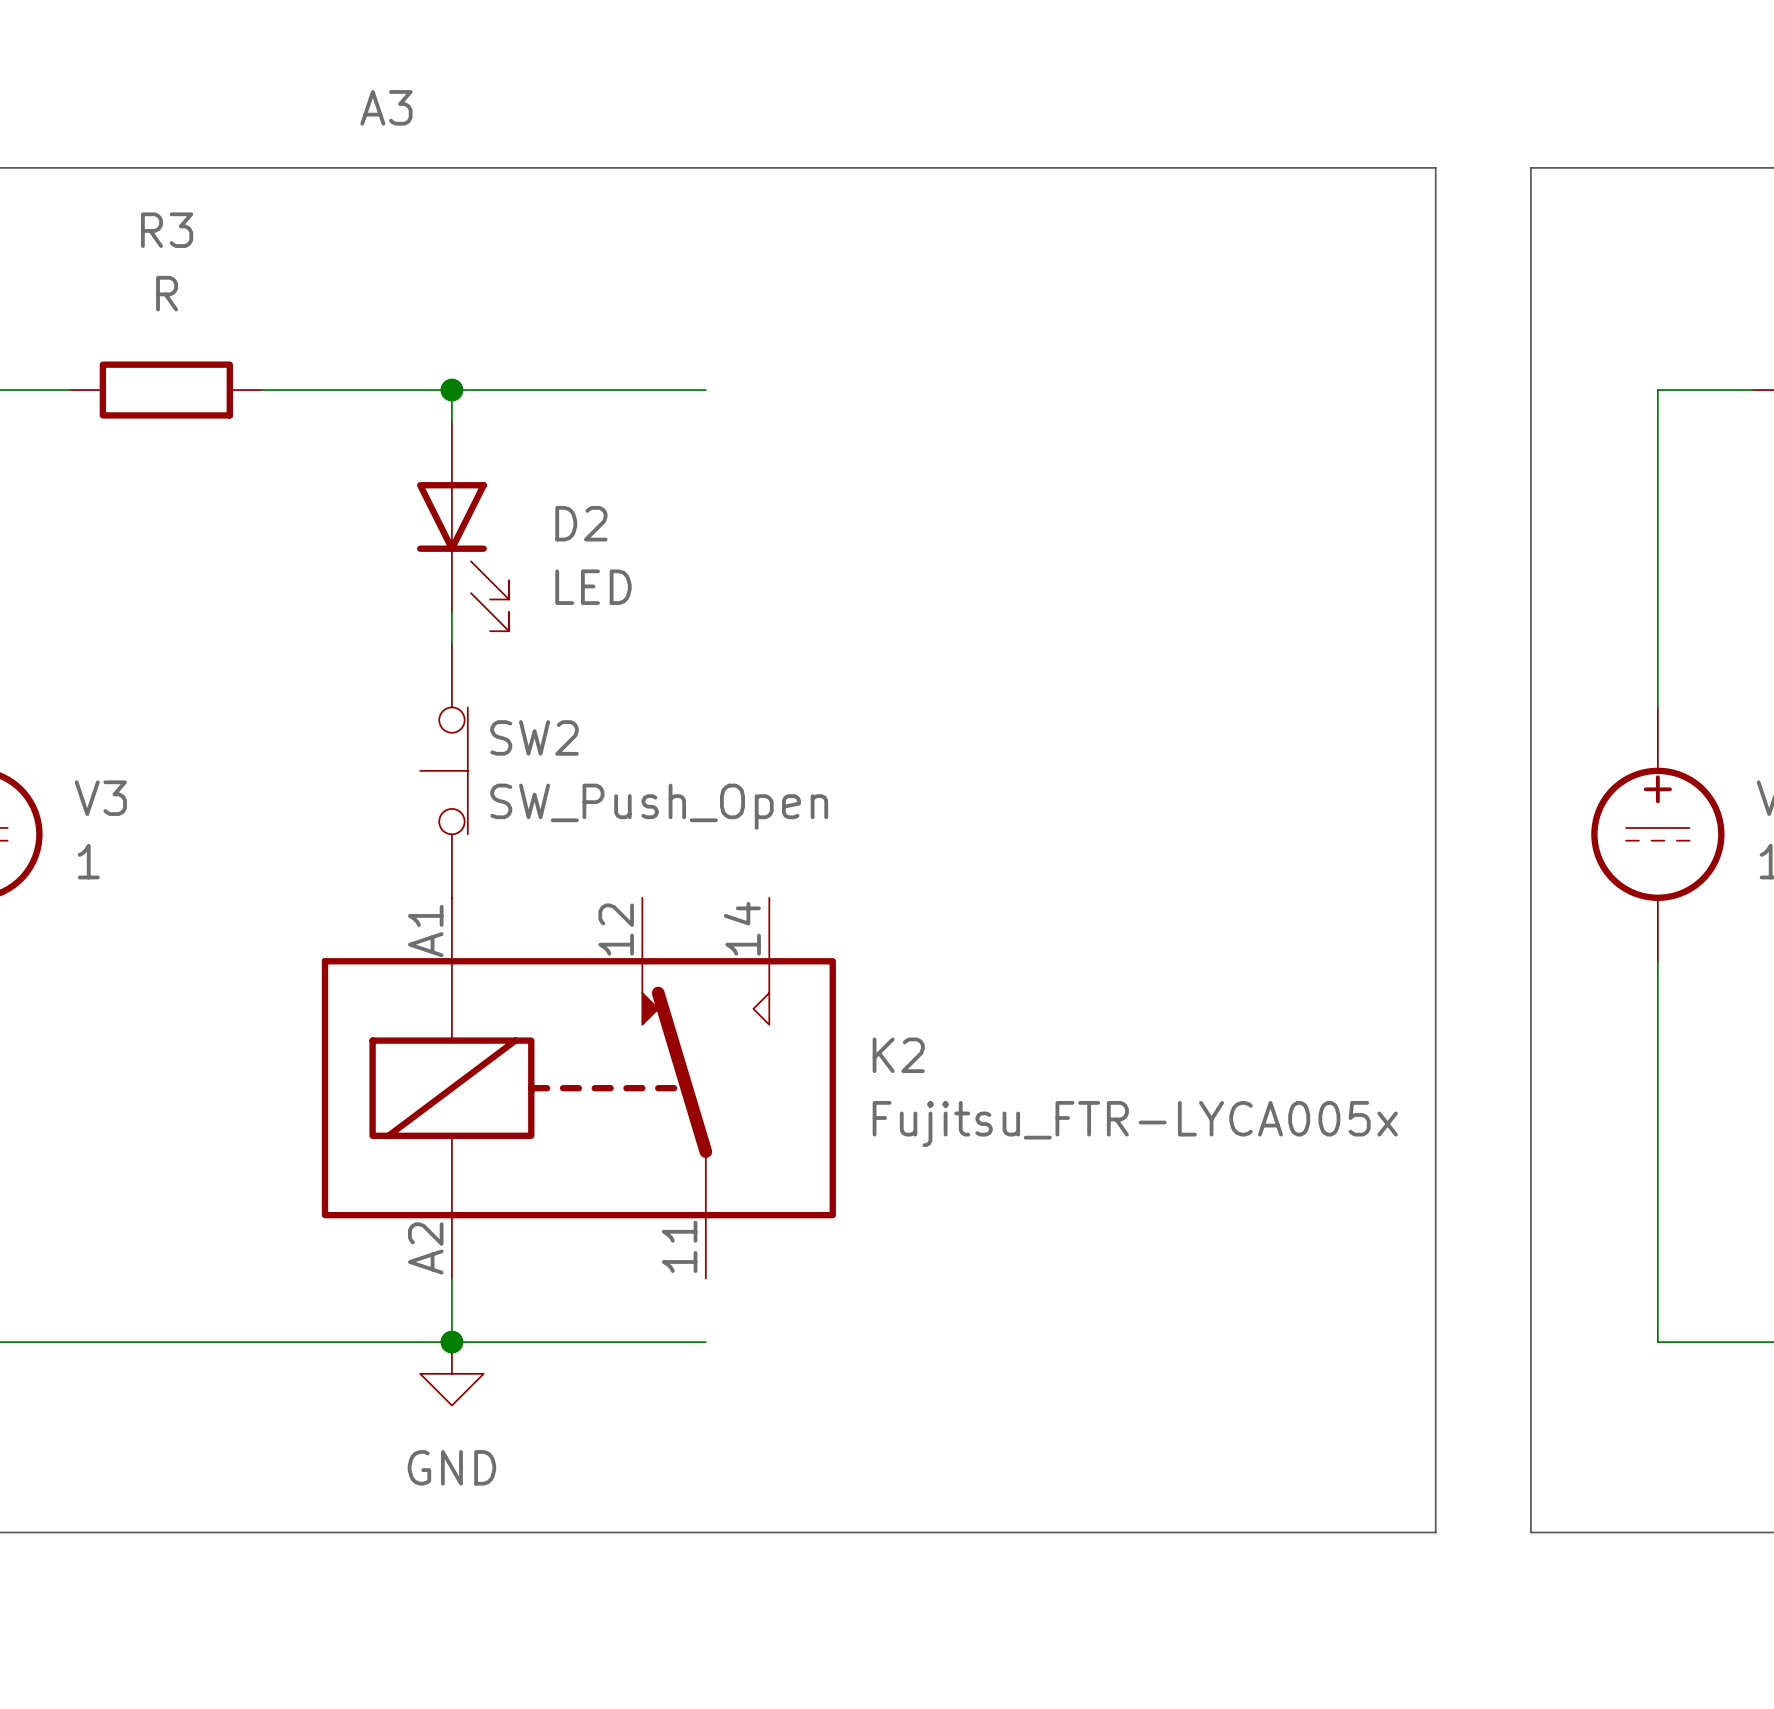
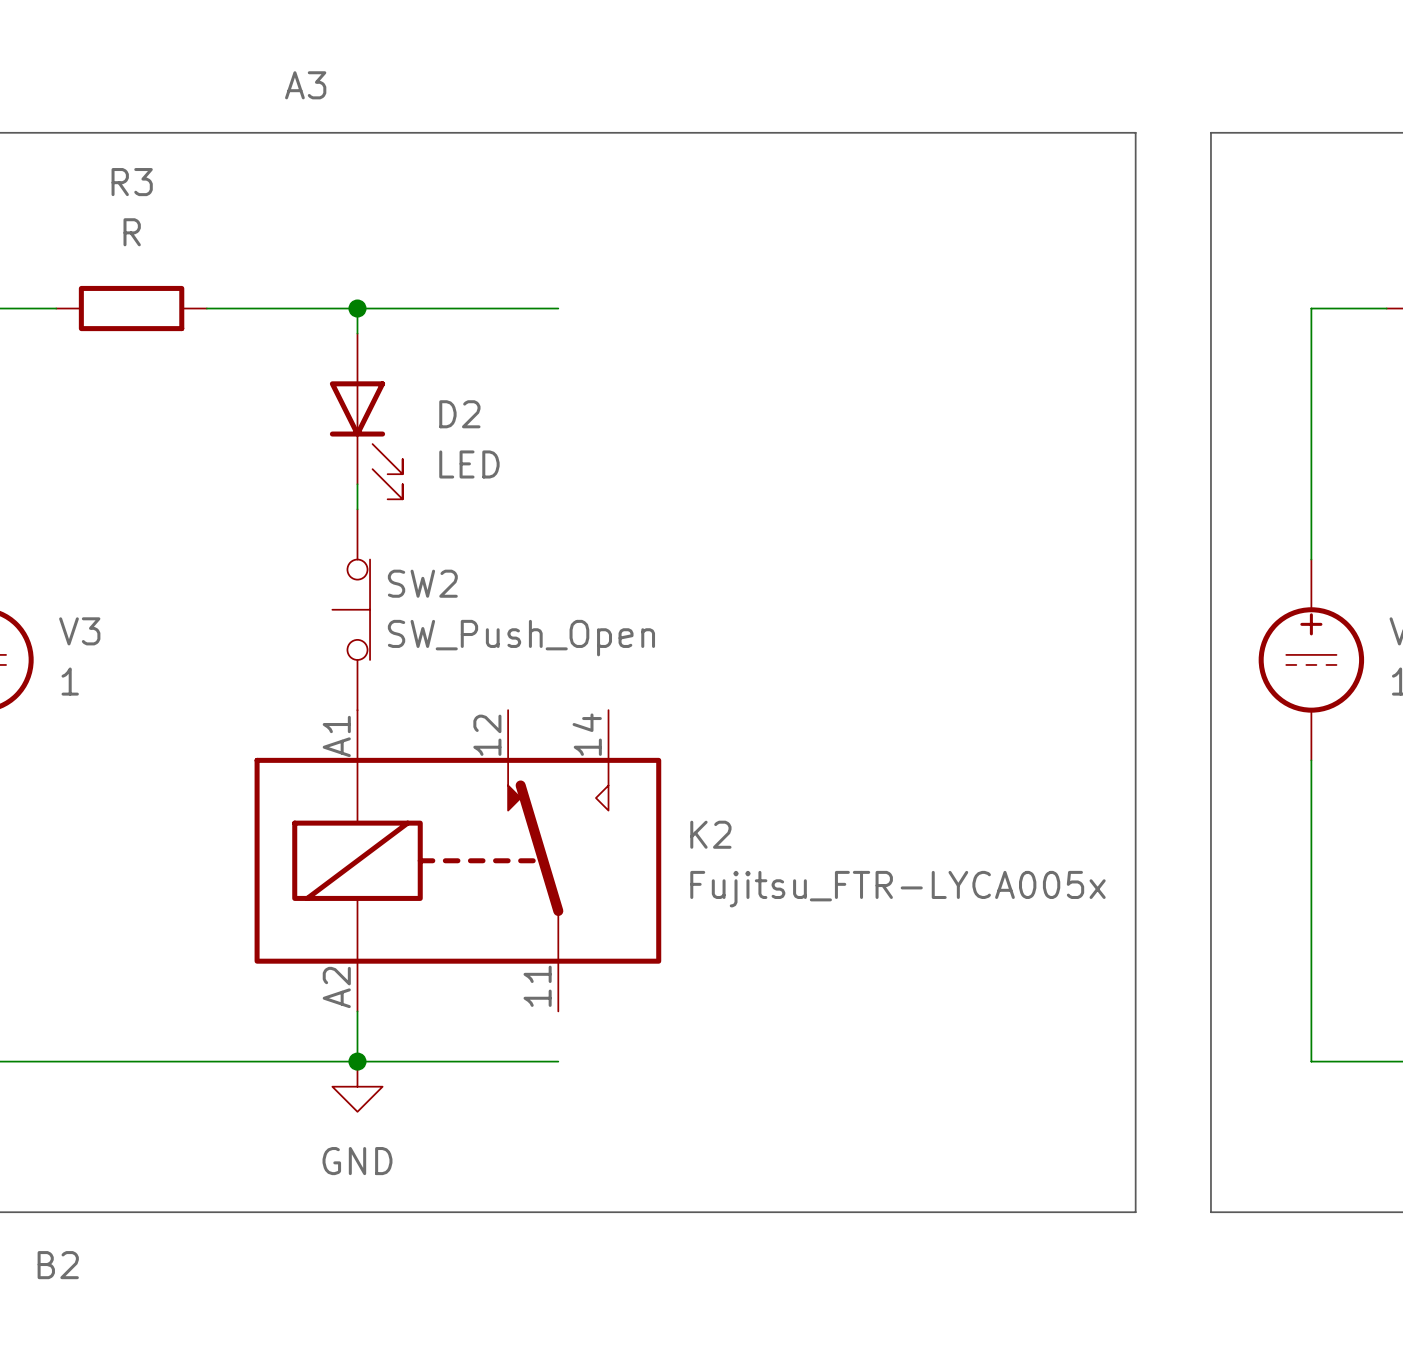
label: none -> B2 (58, 1265)

